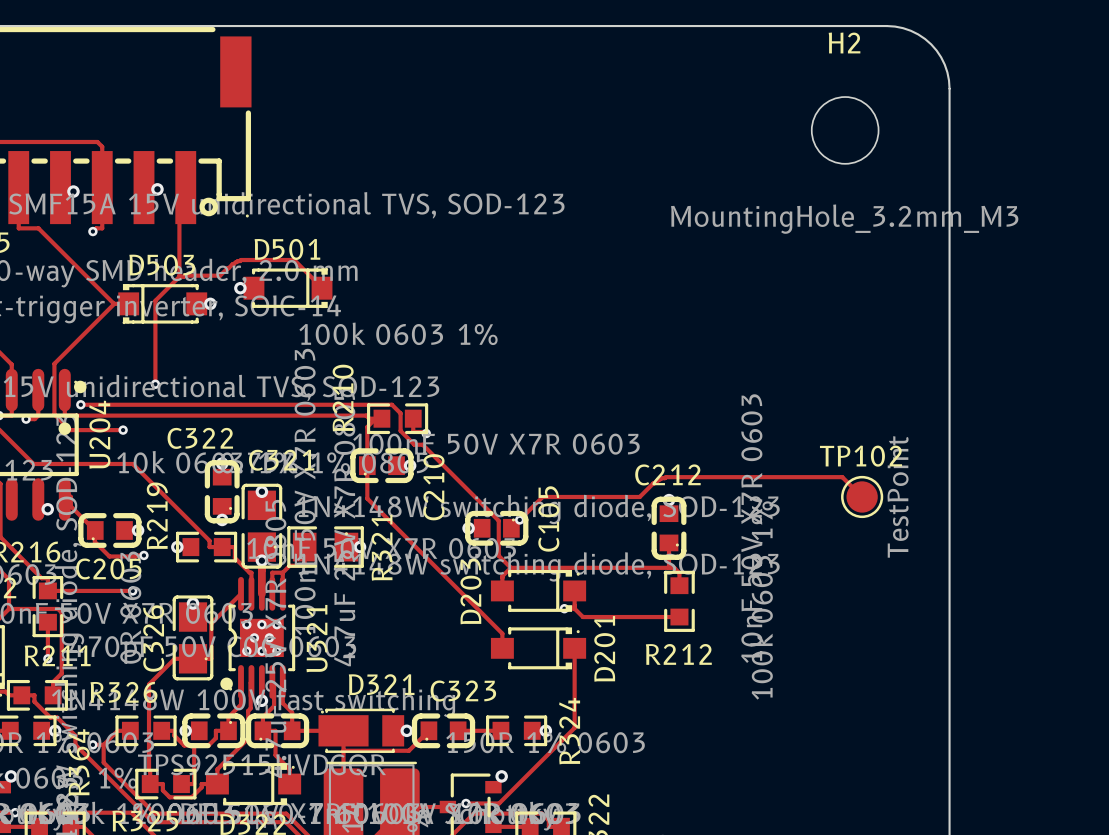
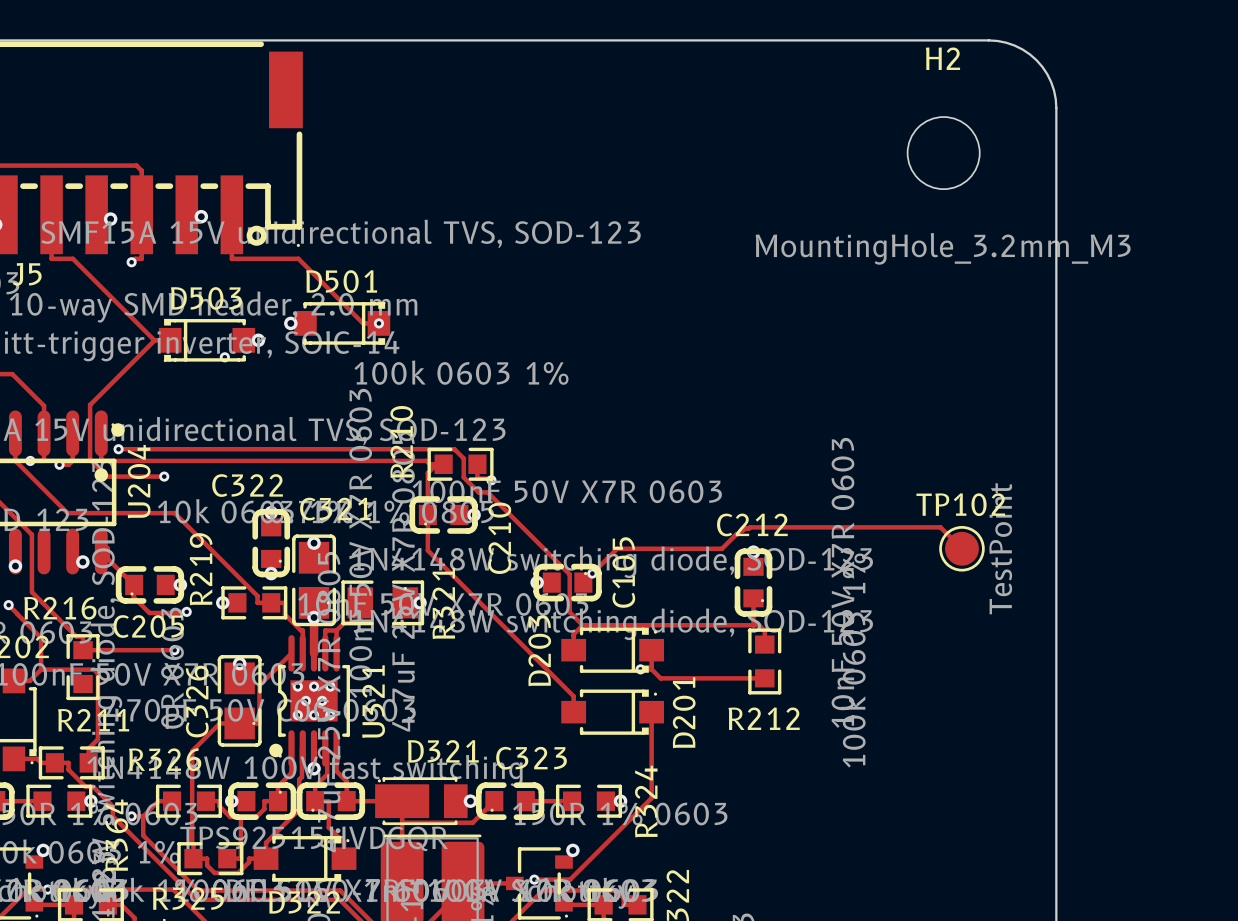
track: (185, 187) (179, 194) (179, 276) -> none
track: (235, 262) (220, 275) (179, 276) -> none
track: (236, 262) (241, 260) (294, 260) (322, 288) -> (231, 214) (231, 258) (298, 258) (363, 323) (378, 323)
track: (179, 276) (155, 300) (155, 384) -> none
via: none -> (378, 323)
via position: (155, 384) -> (224, 357)
track: (47, 622) (47, 658) -> none
via: (47, 658) -> none

